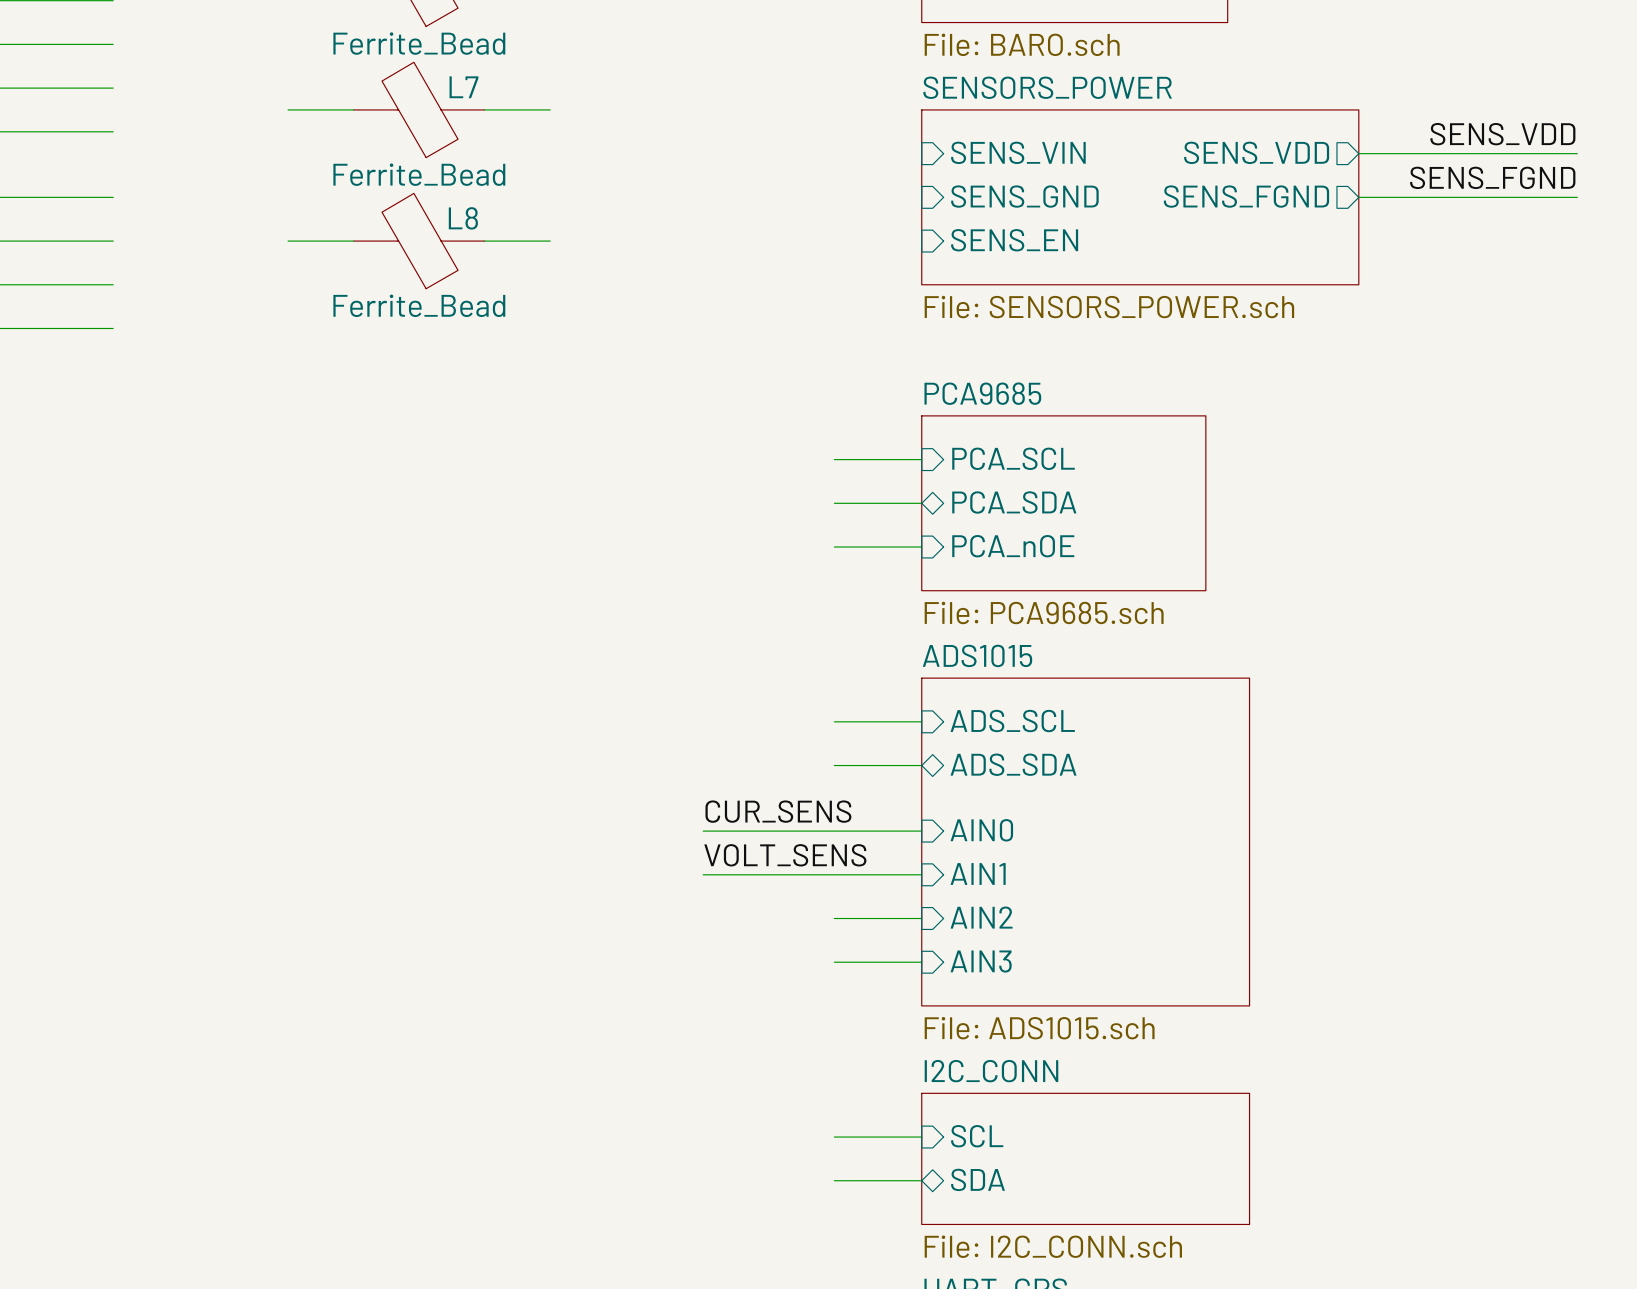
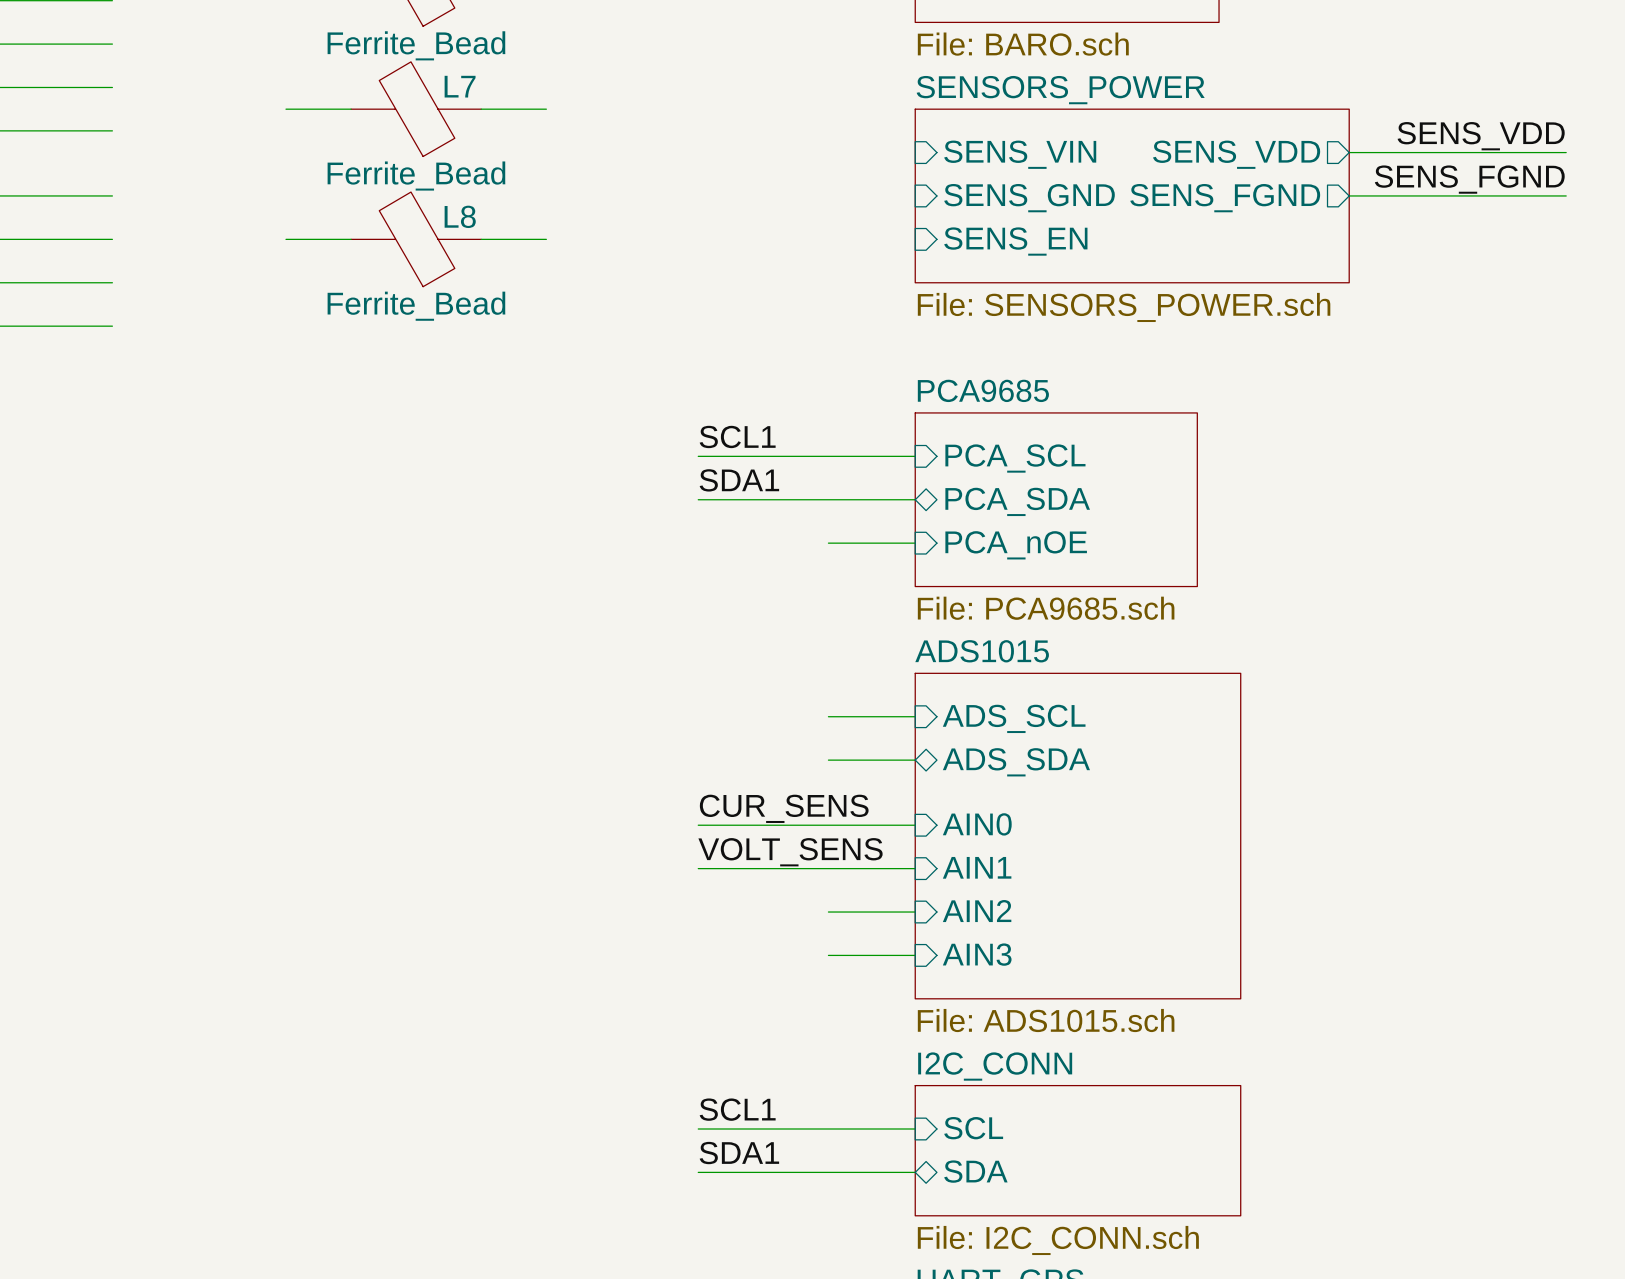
label: none -> SCL1 (737, 436)
wire: none -> (698, 456) (828, 456)
label: none -> SDA1 (739, 480)
wire: none -> (698, 499) (828, 499)
label: none -> SCL1 (737, 1109)
wire: none -> (698, 1129) (828, 1129)
label: none -> SDA1 (739, 1153)
wire: none -> (698, 1172) (828, 1172)

